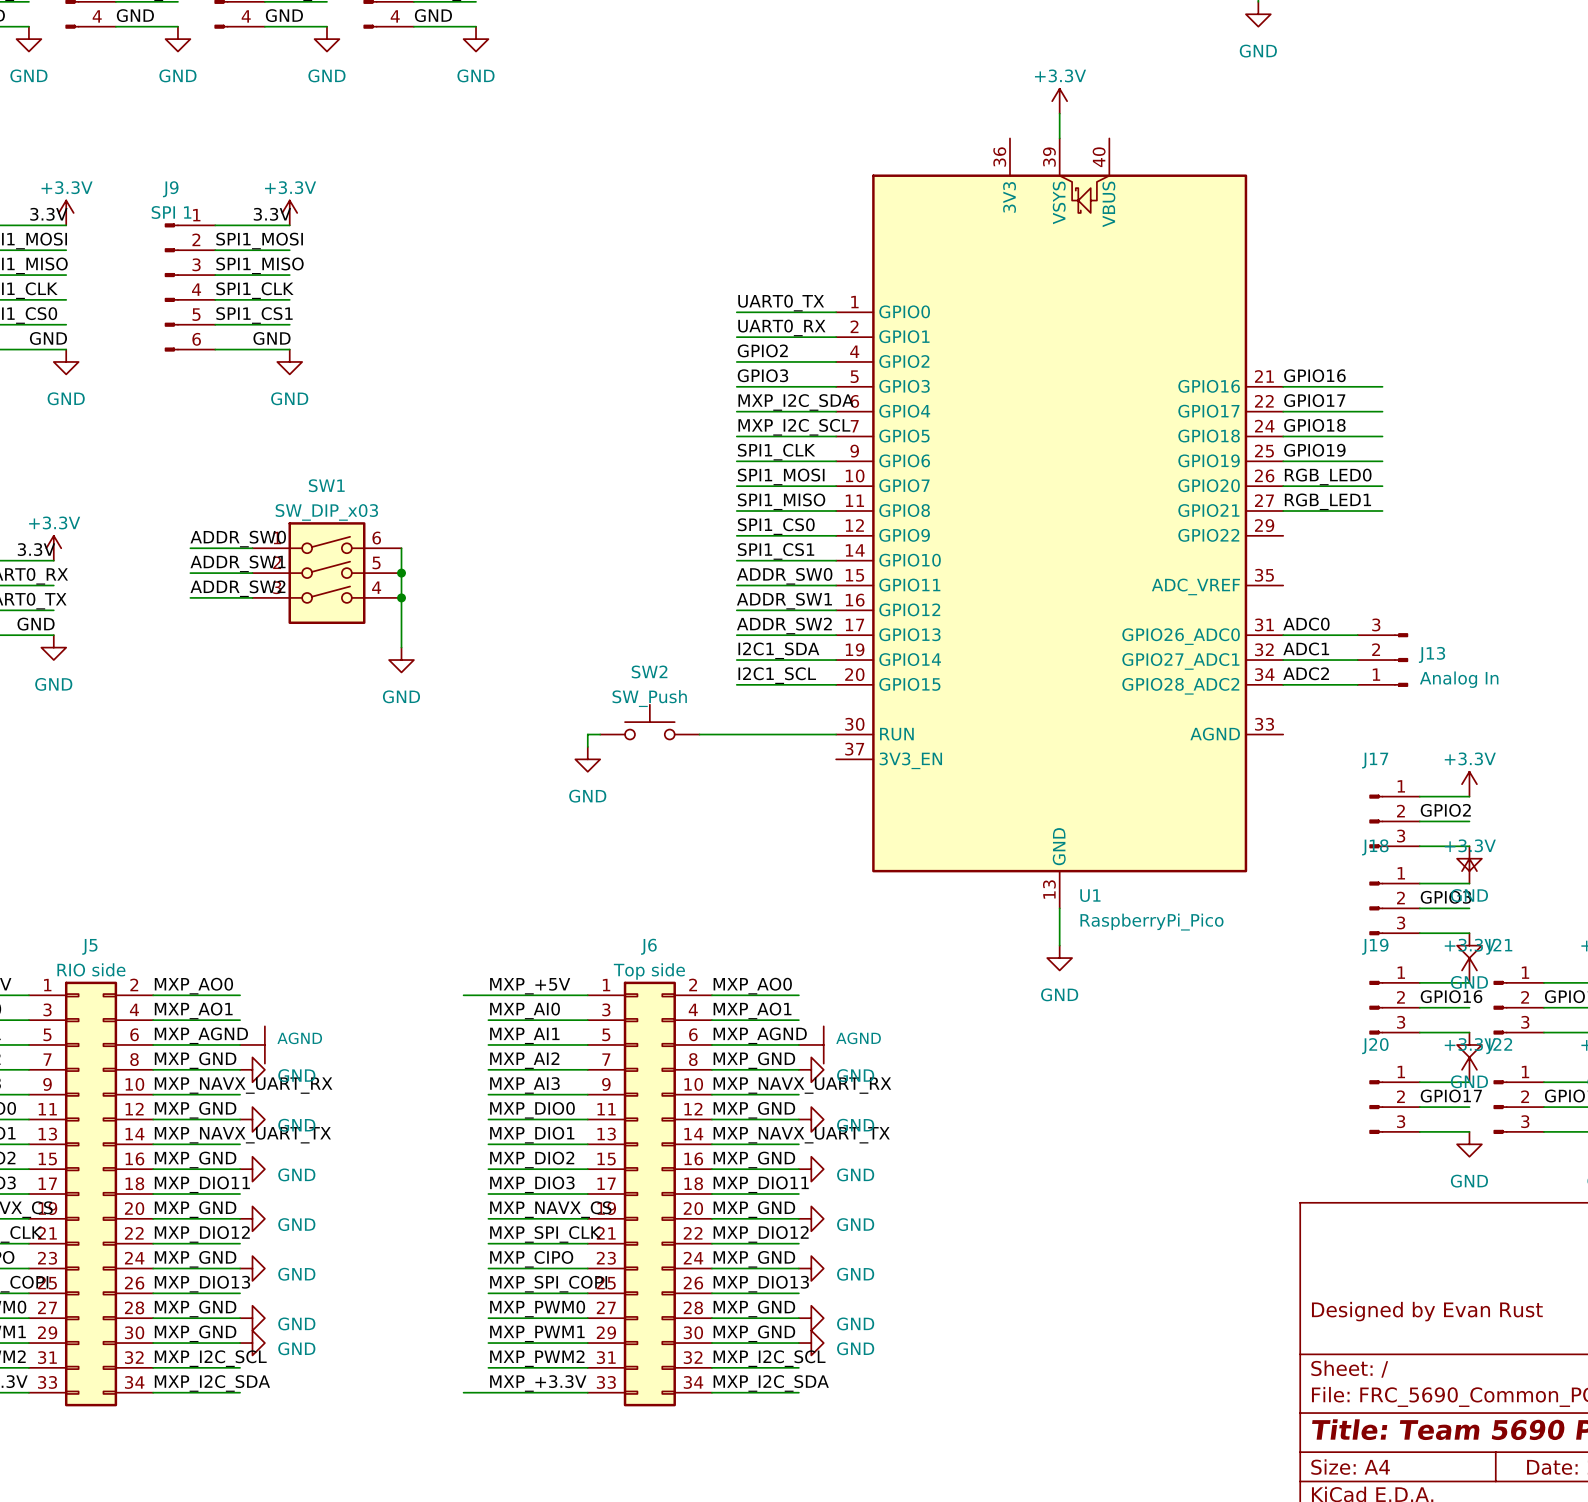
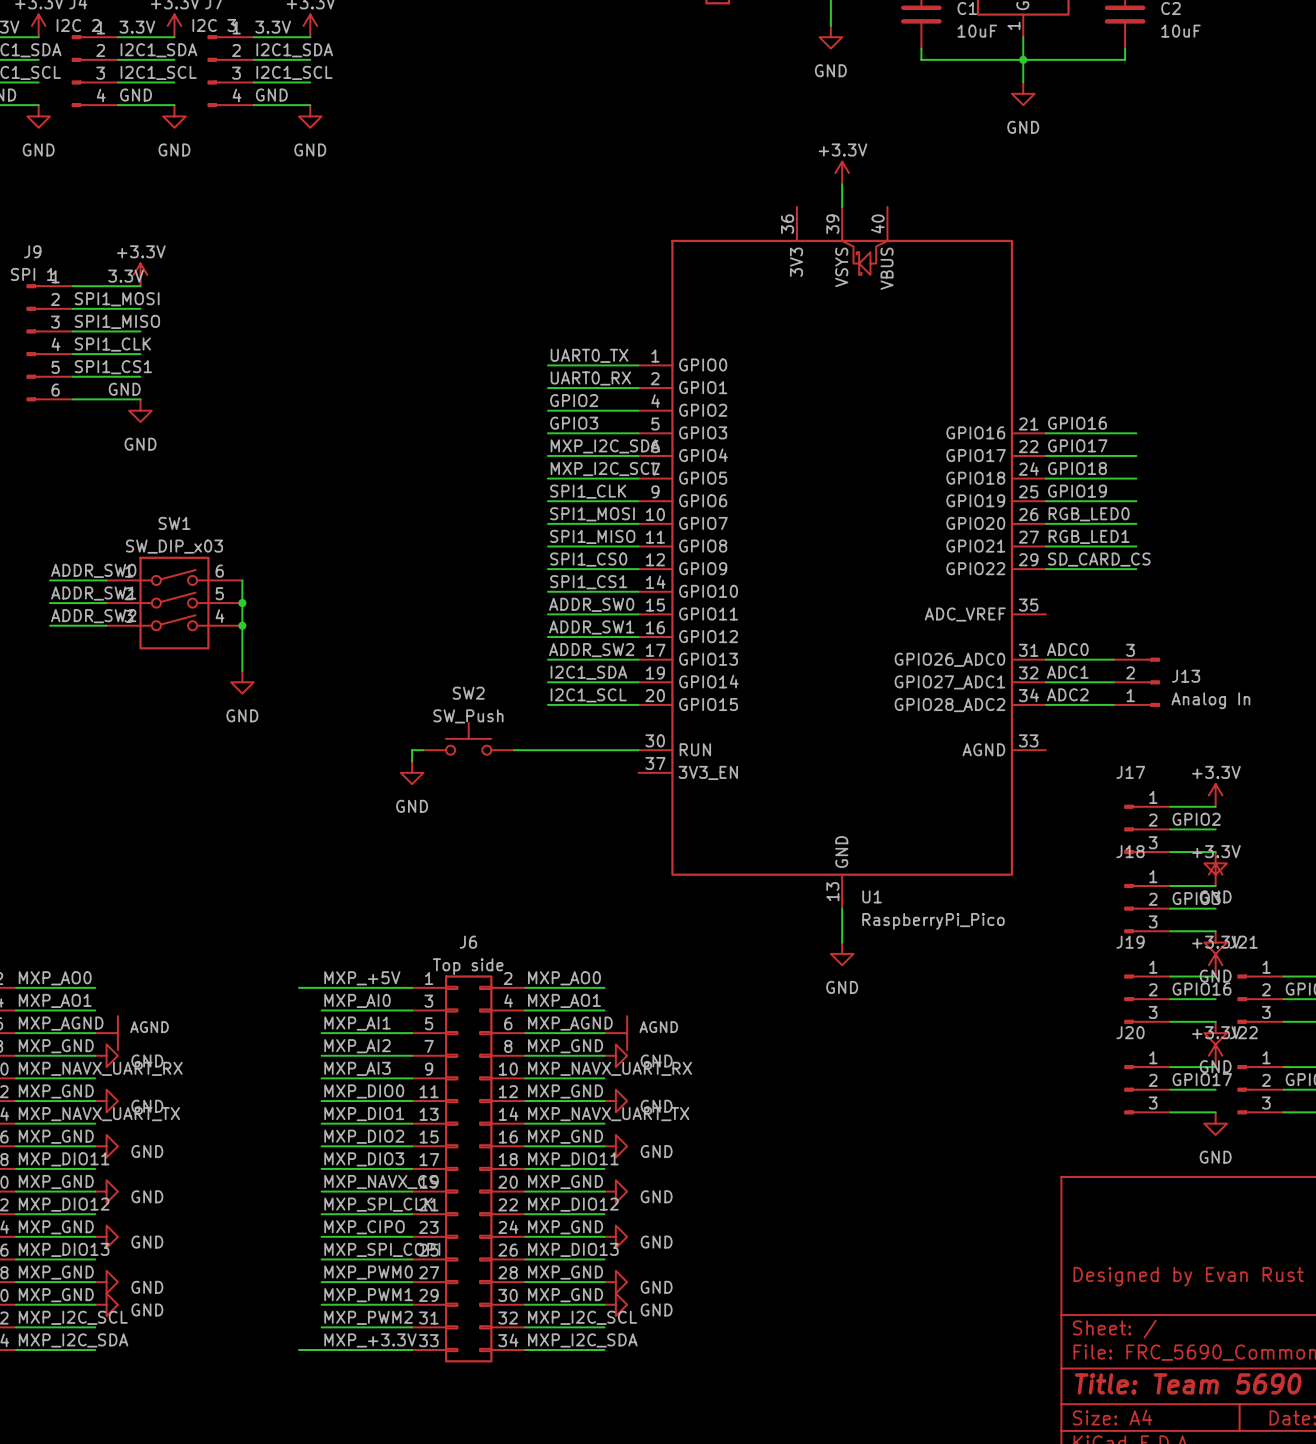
label: none -> SD_CARD_CS (1099, 559)
wire: none -> (1045, 569) (1136, 569)

